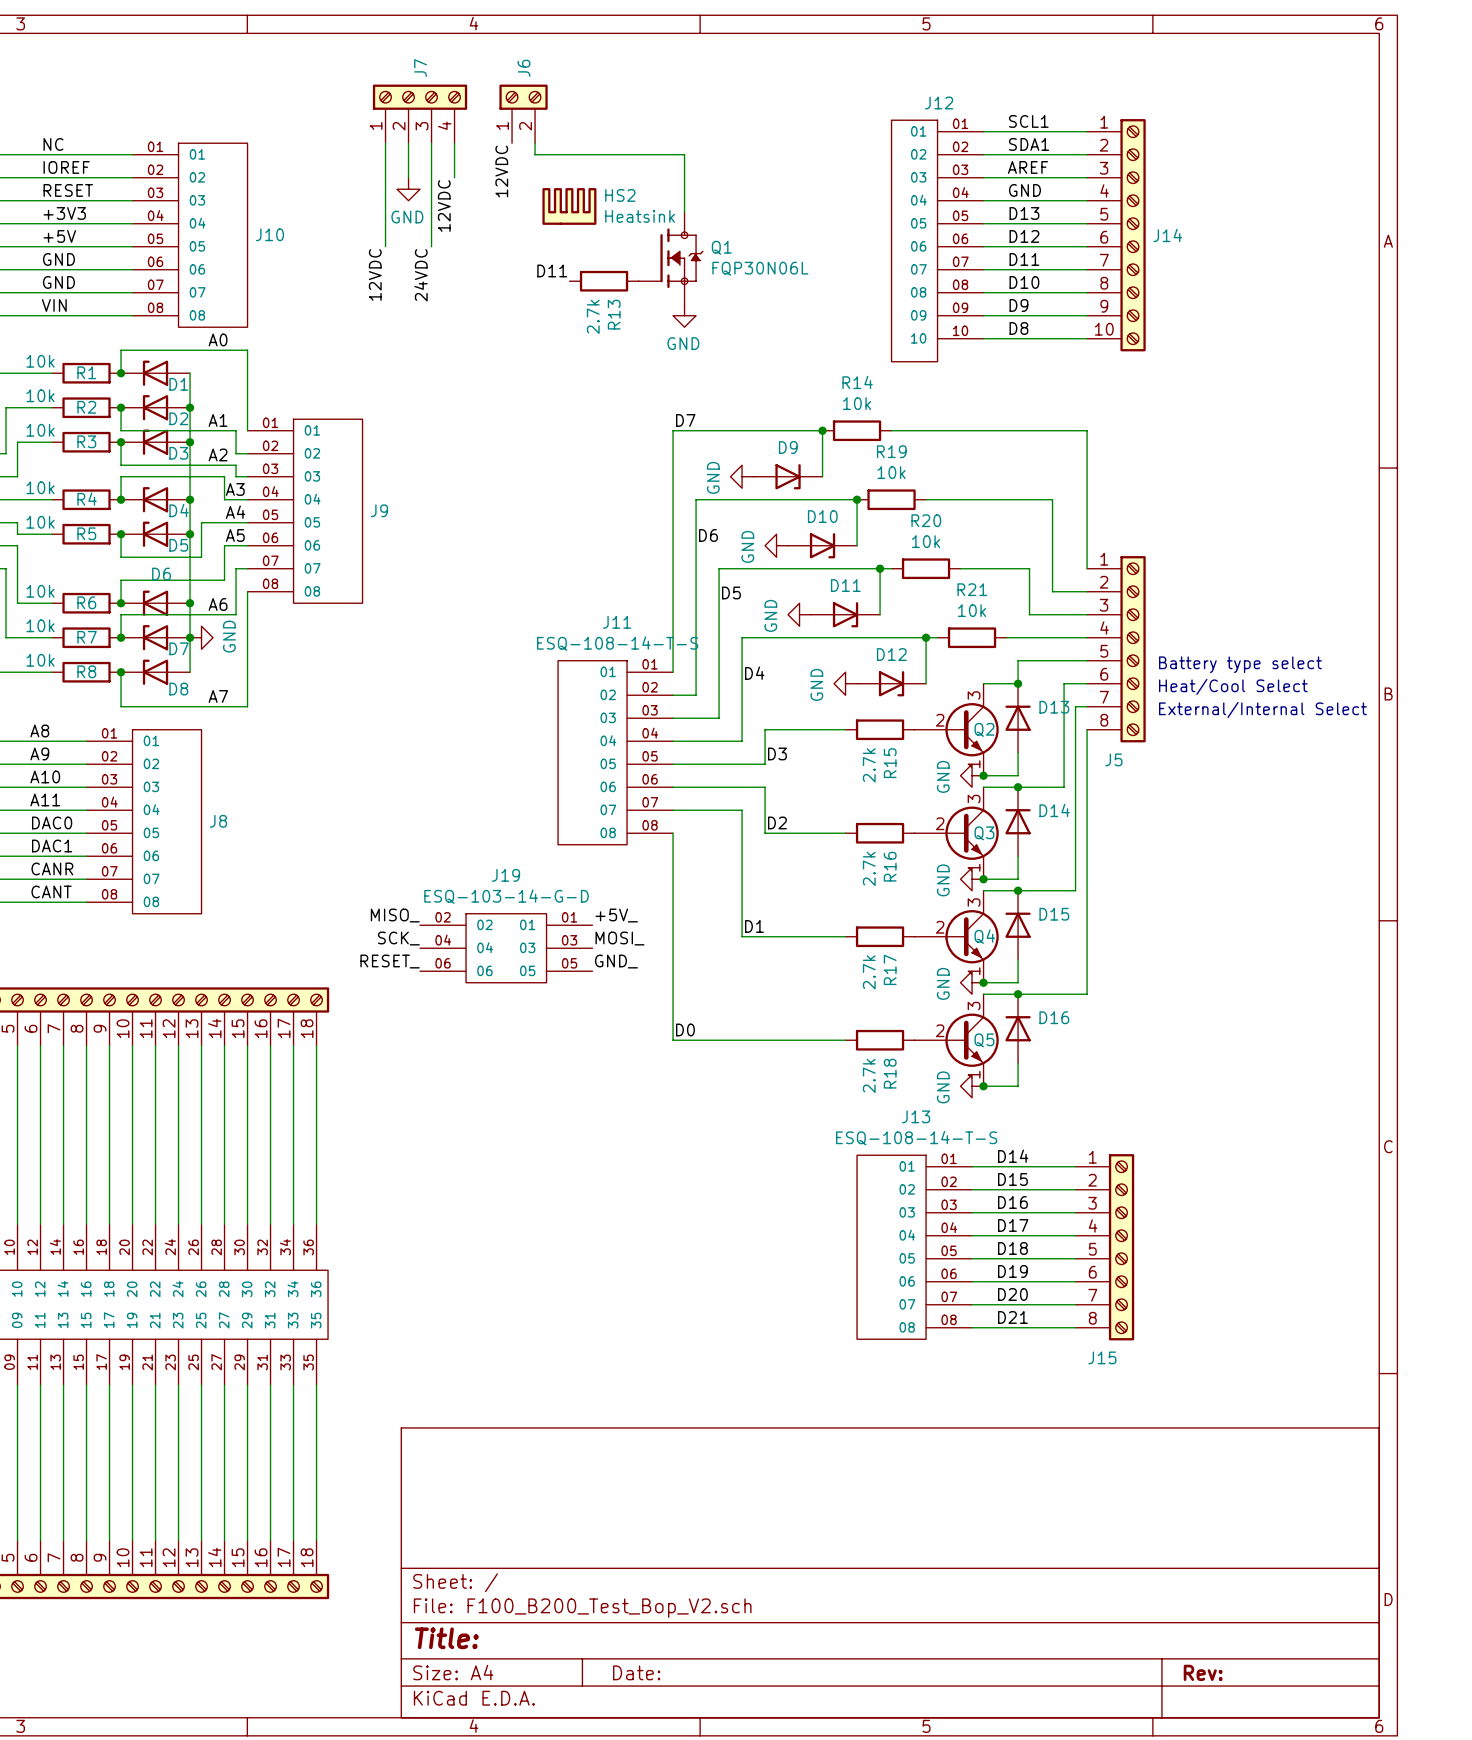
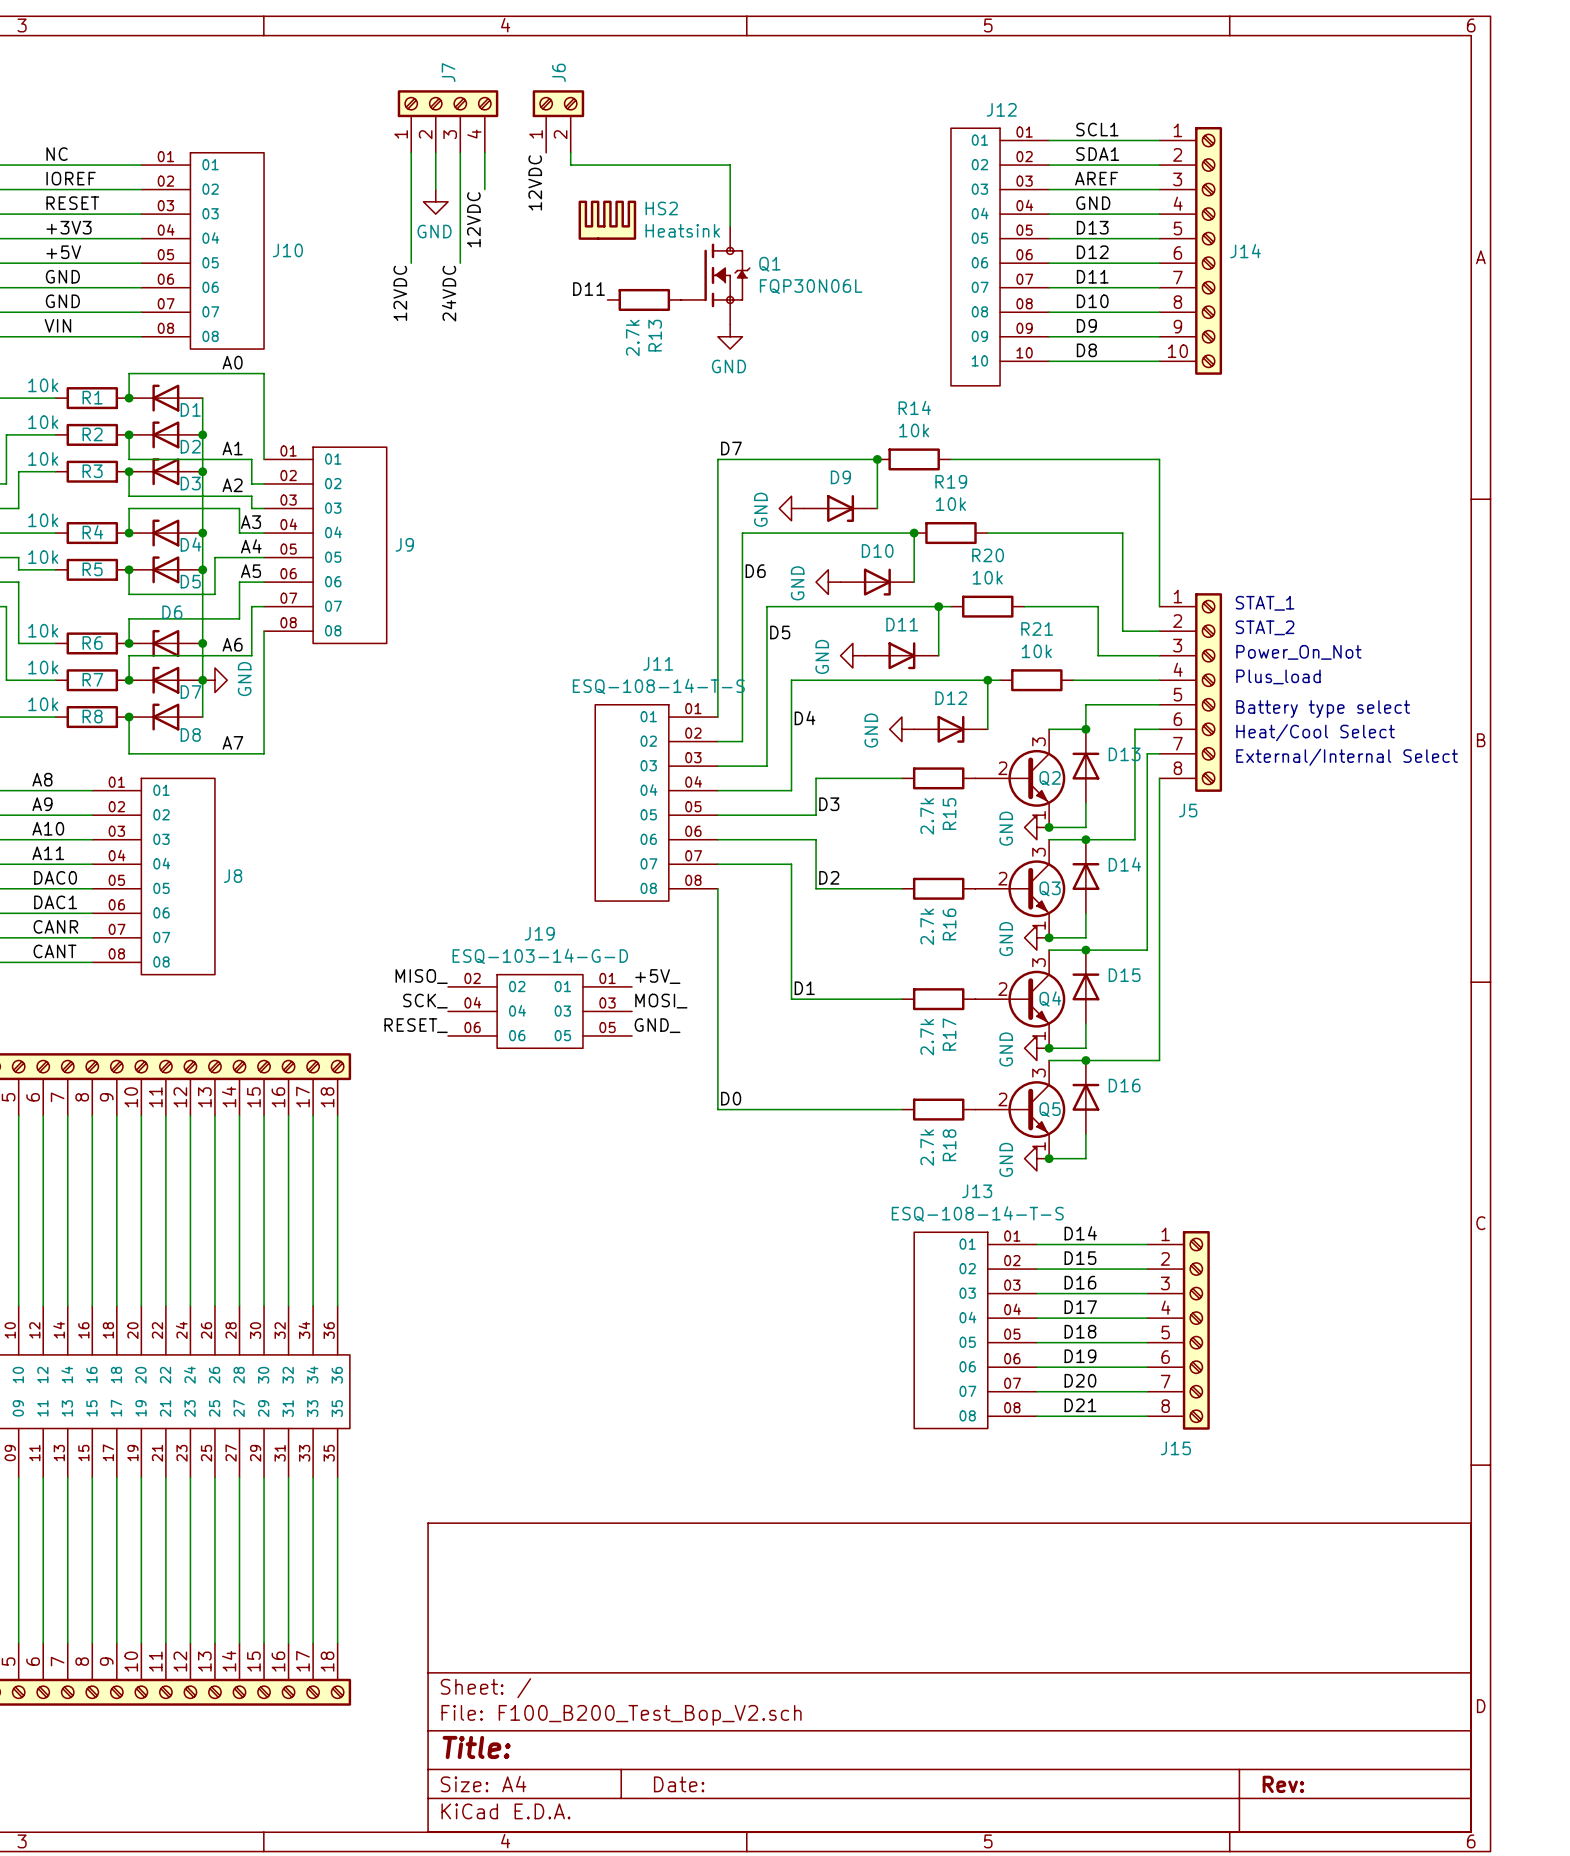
text: none -> STAT_1 (1265, 603)
text: none -> STAT_2 (1265, 627)
text: none -> Power_On_Not (1298, 652)
text: none -> Plus_load (1278, 676)

